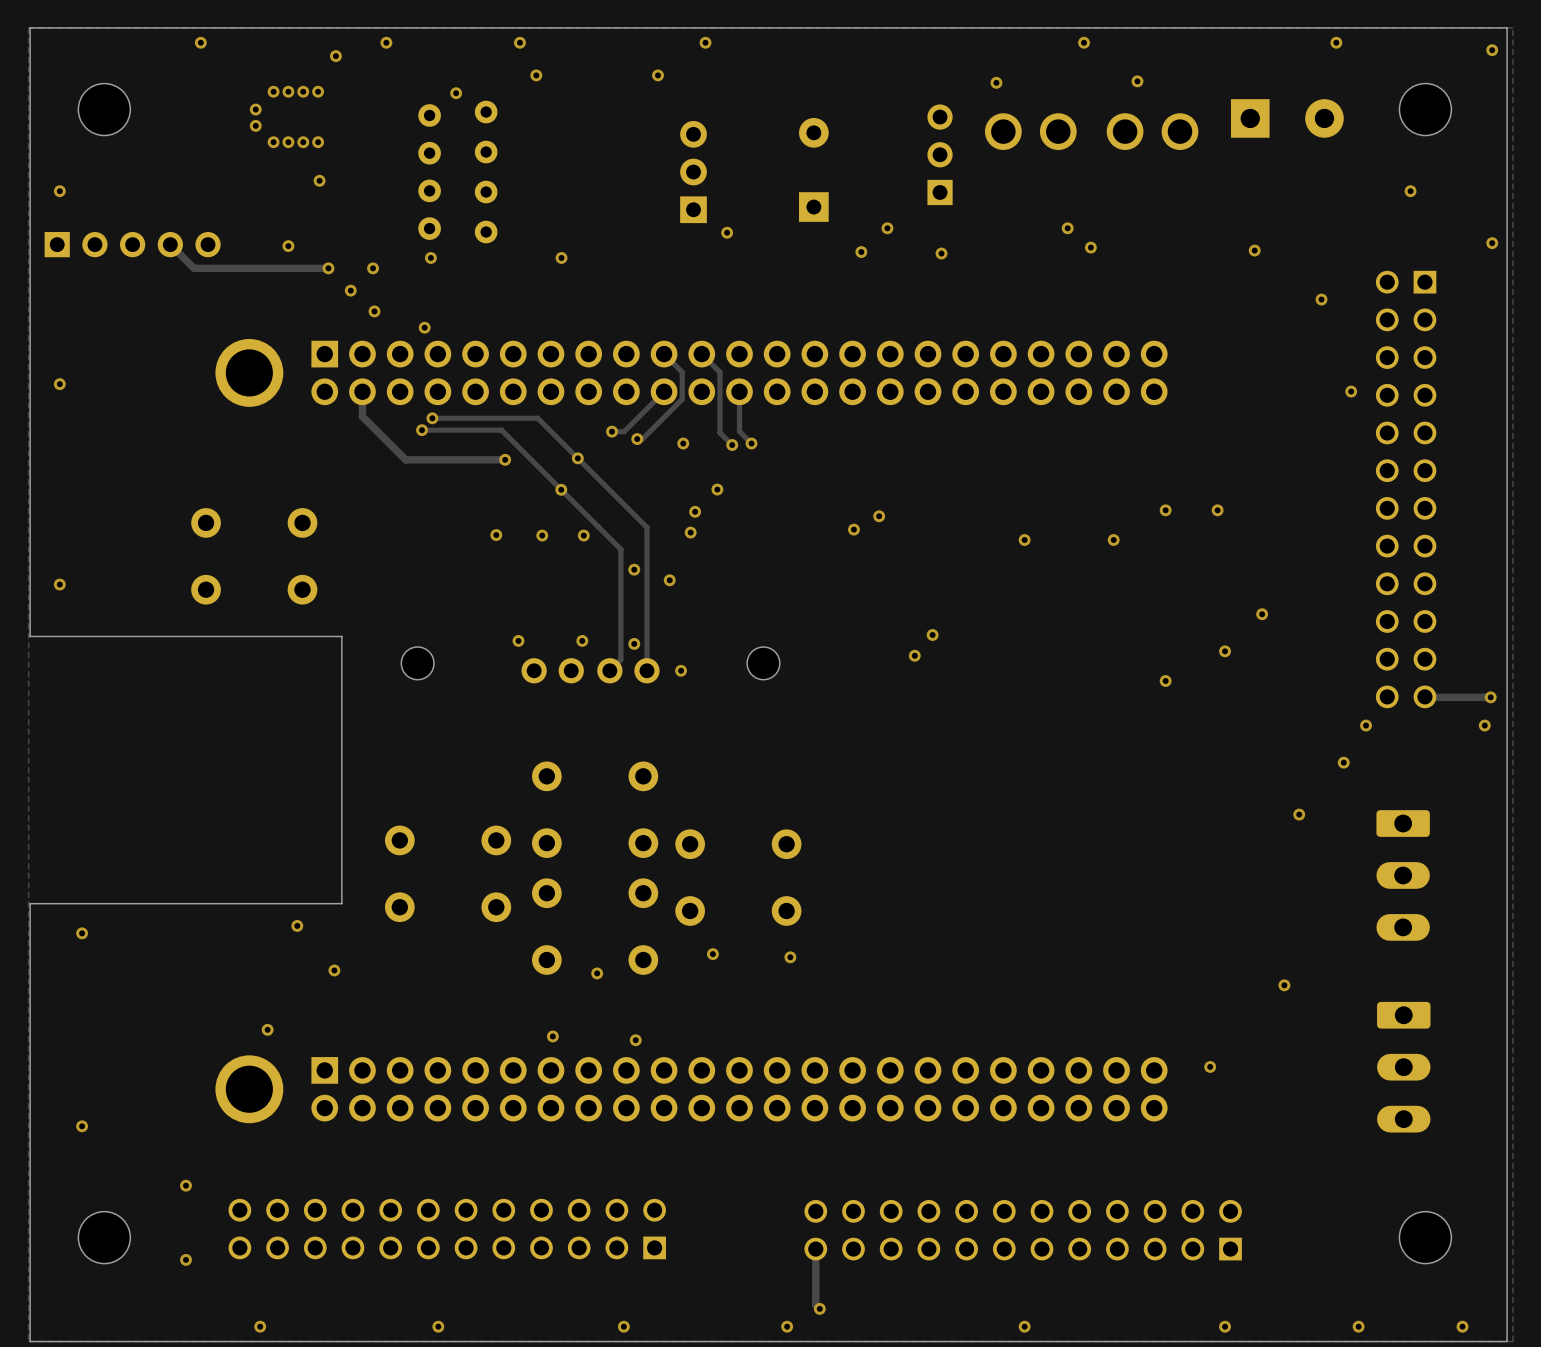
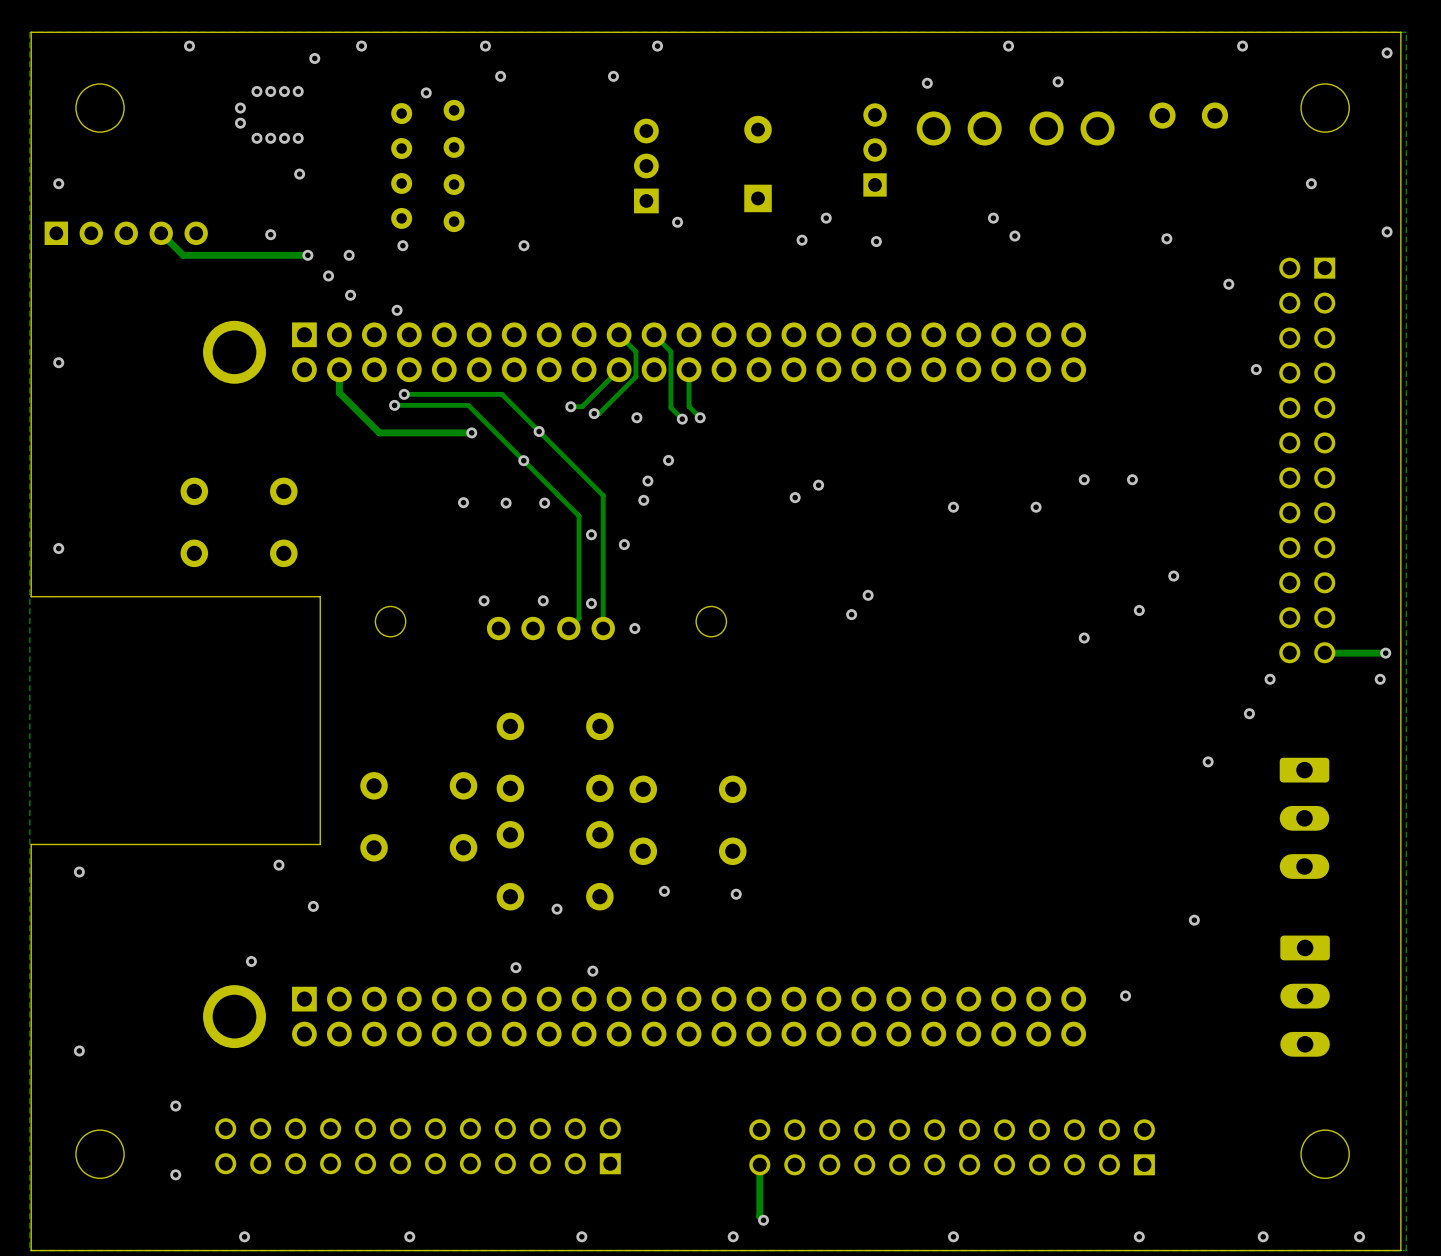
part footprint: [1230, 99, 1344, 138] -> [1149, 102, 1229, 129]

